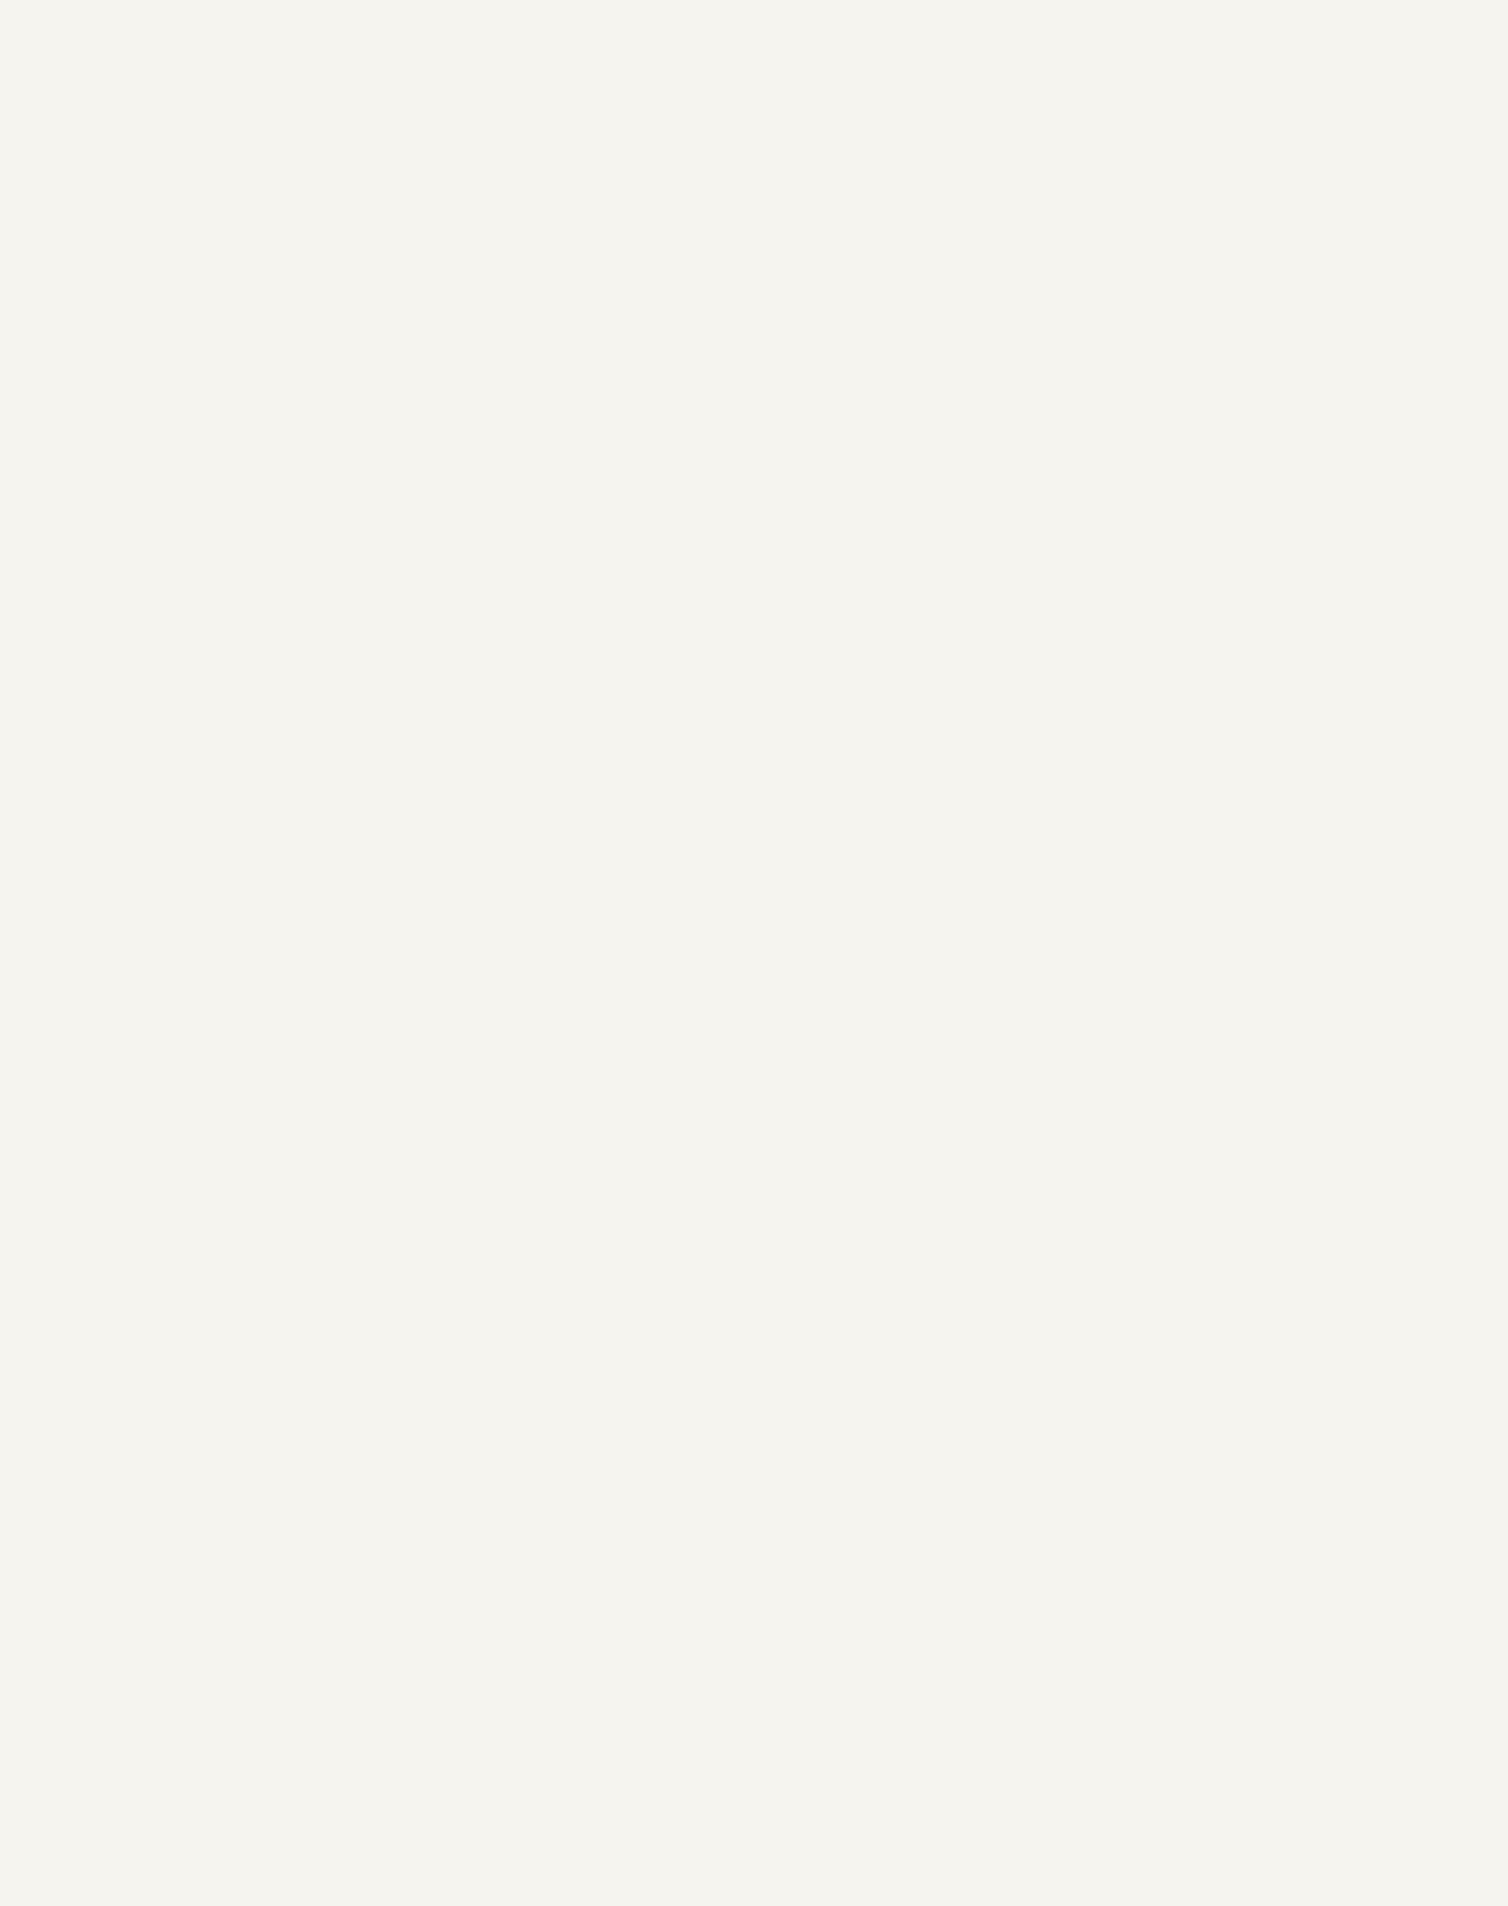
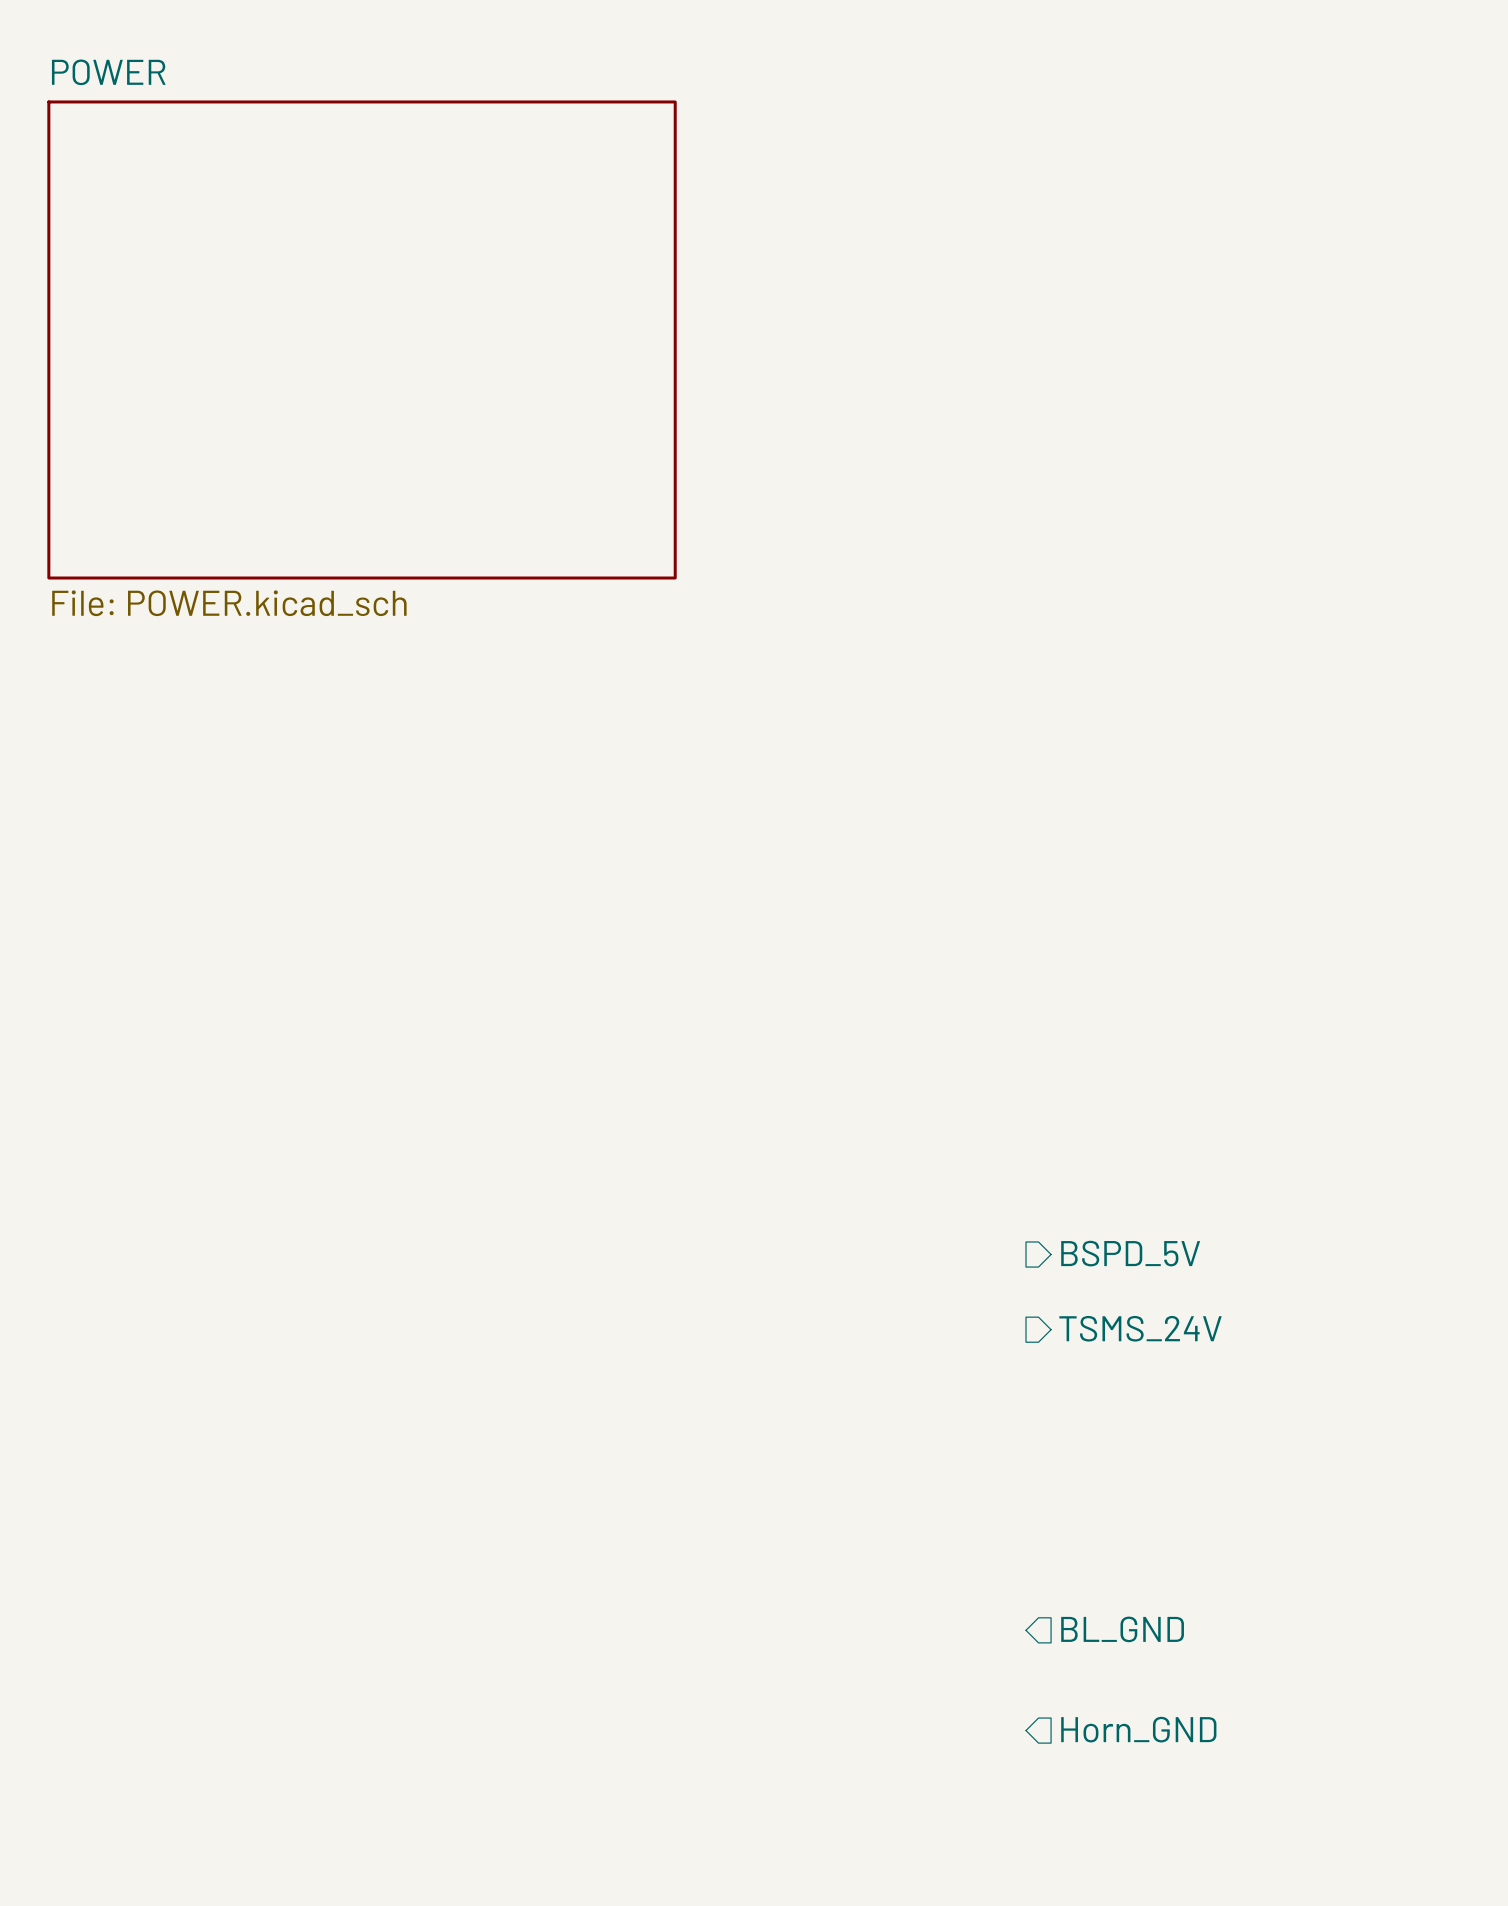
sheet POWER: none -> File: POWER.kicad_sch (362, 339)
sheet pin: none -> BSPD_5V (1130, 1253)
sheet pin: none -> TSMS_24V (1140, 1328)
sheet pin: none -> BL_GND (1122, 1629)
sheet pin: none -> Horn_GND (1138, 1729)

